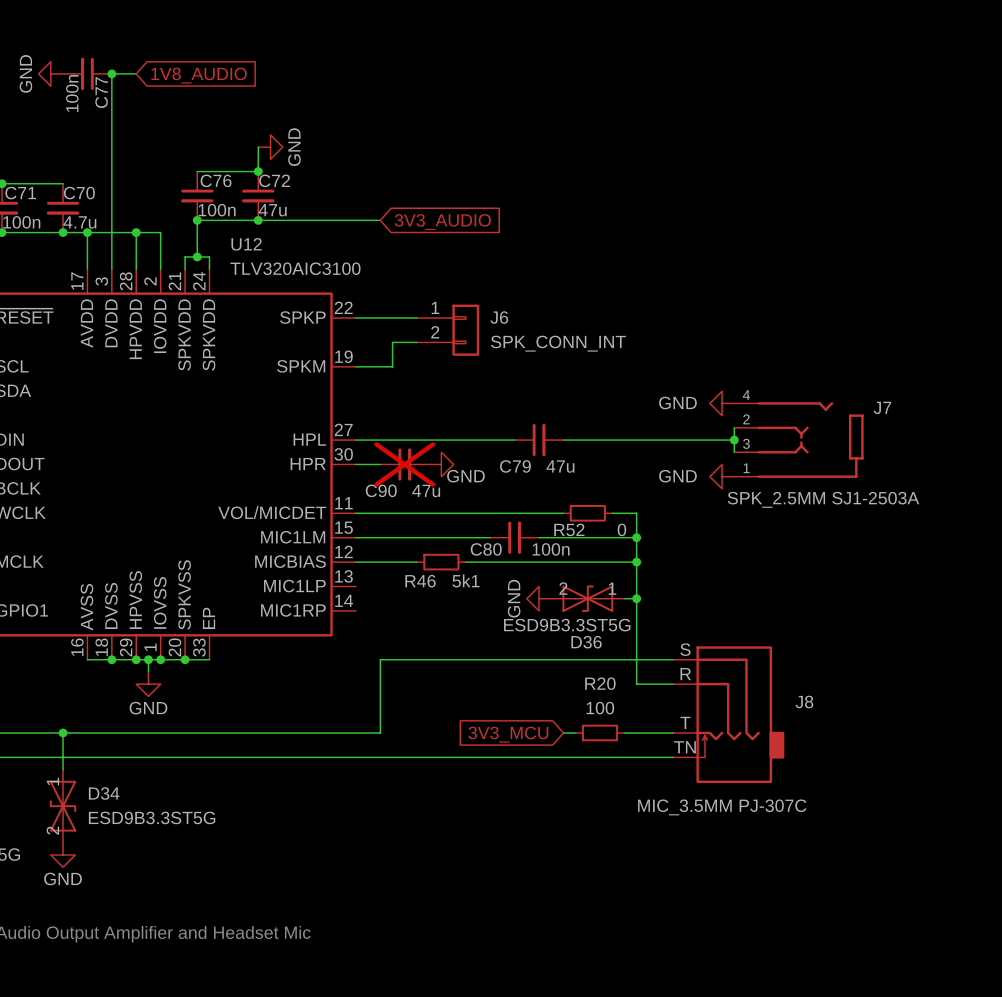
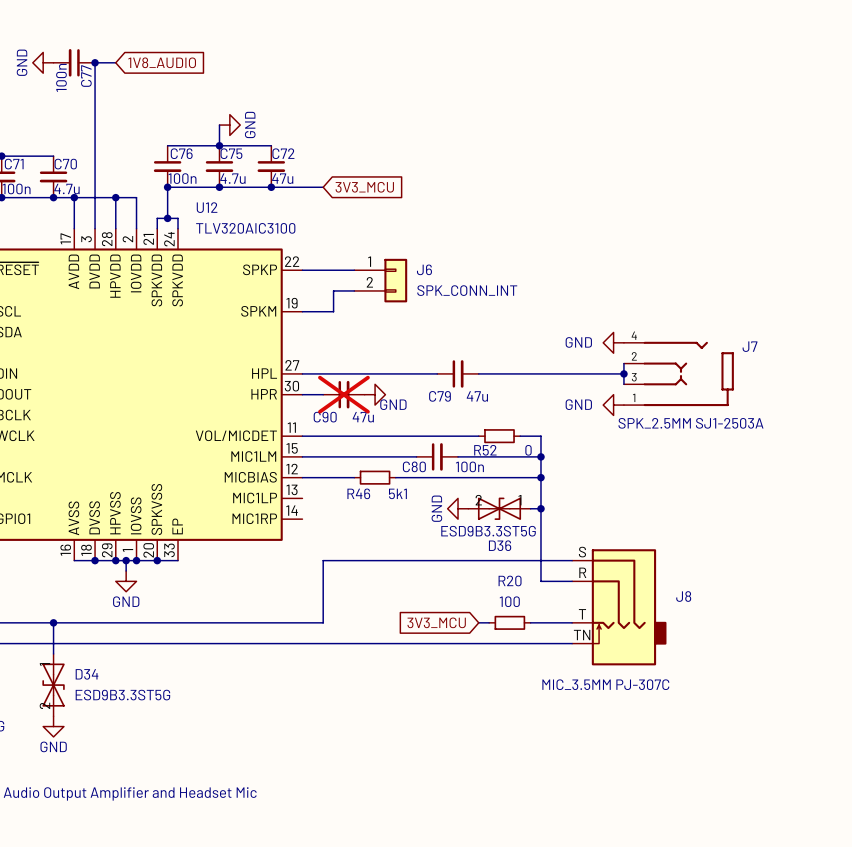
wire: none -> (219, 145) (271, 145)
C72 name: C72 (274, 180) -> C75 (231, 153)
C72: none -> 47u (271, 166)
C72 value: 47u (272, 210) -> 4.7u (232, 178)
junction: none -> (271, 187)
global label: 3V3_AUDIO (442, 222) -> 3V3_MCU (364, 187)

